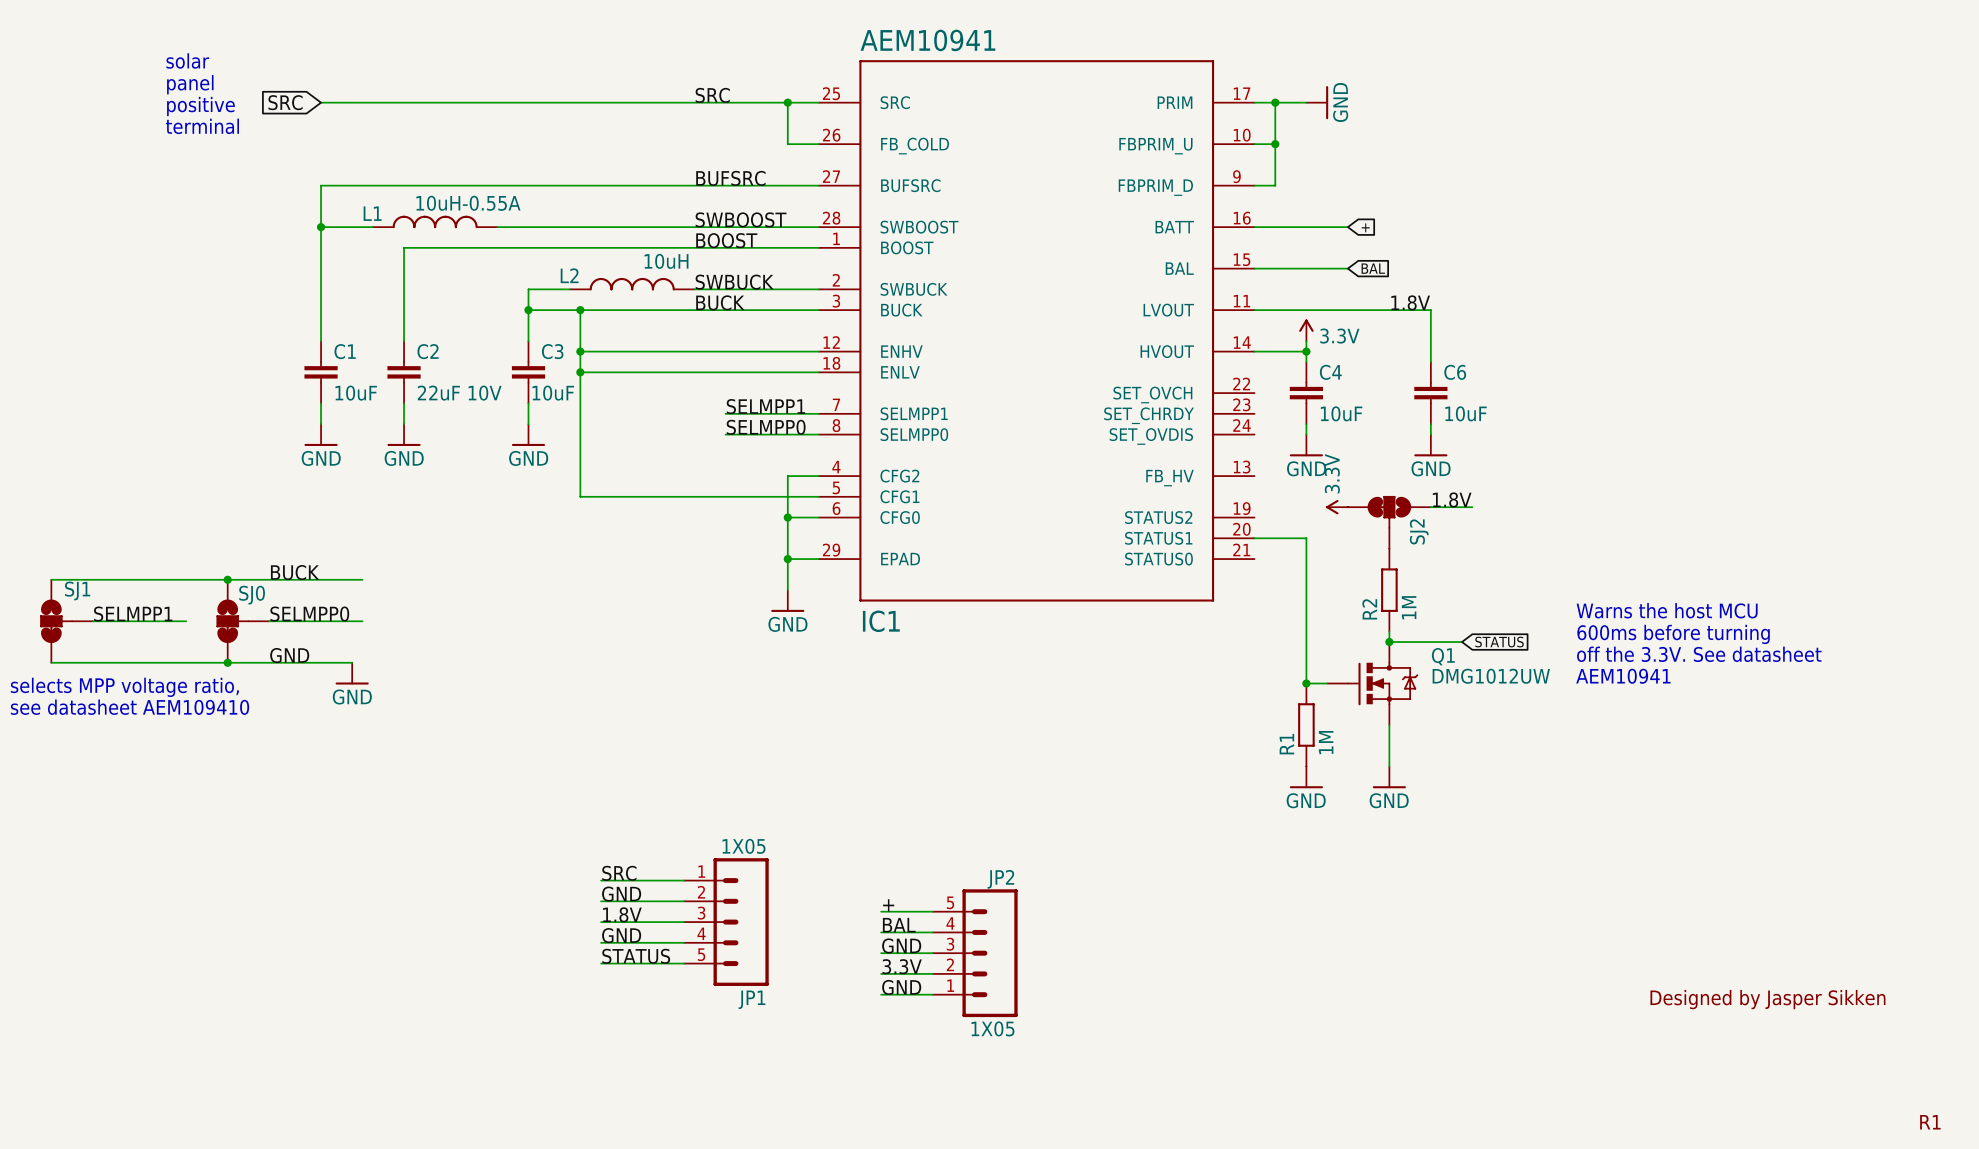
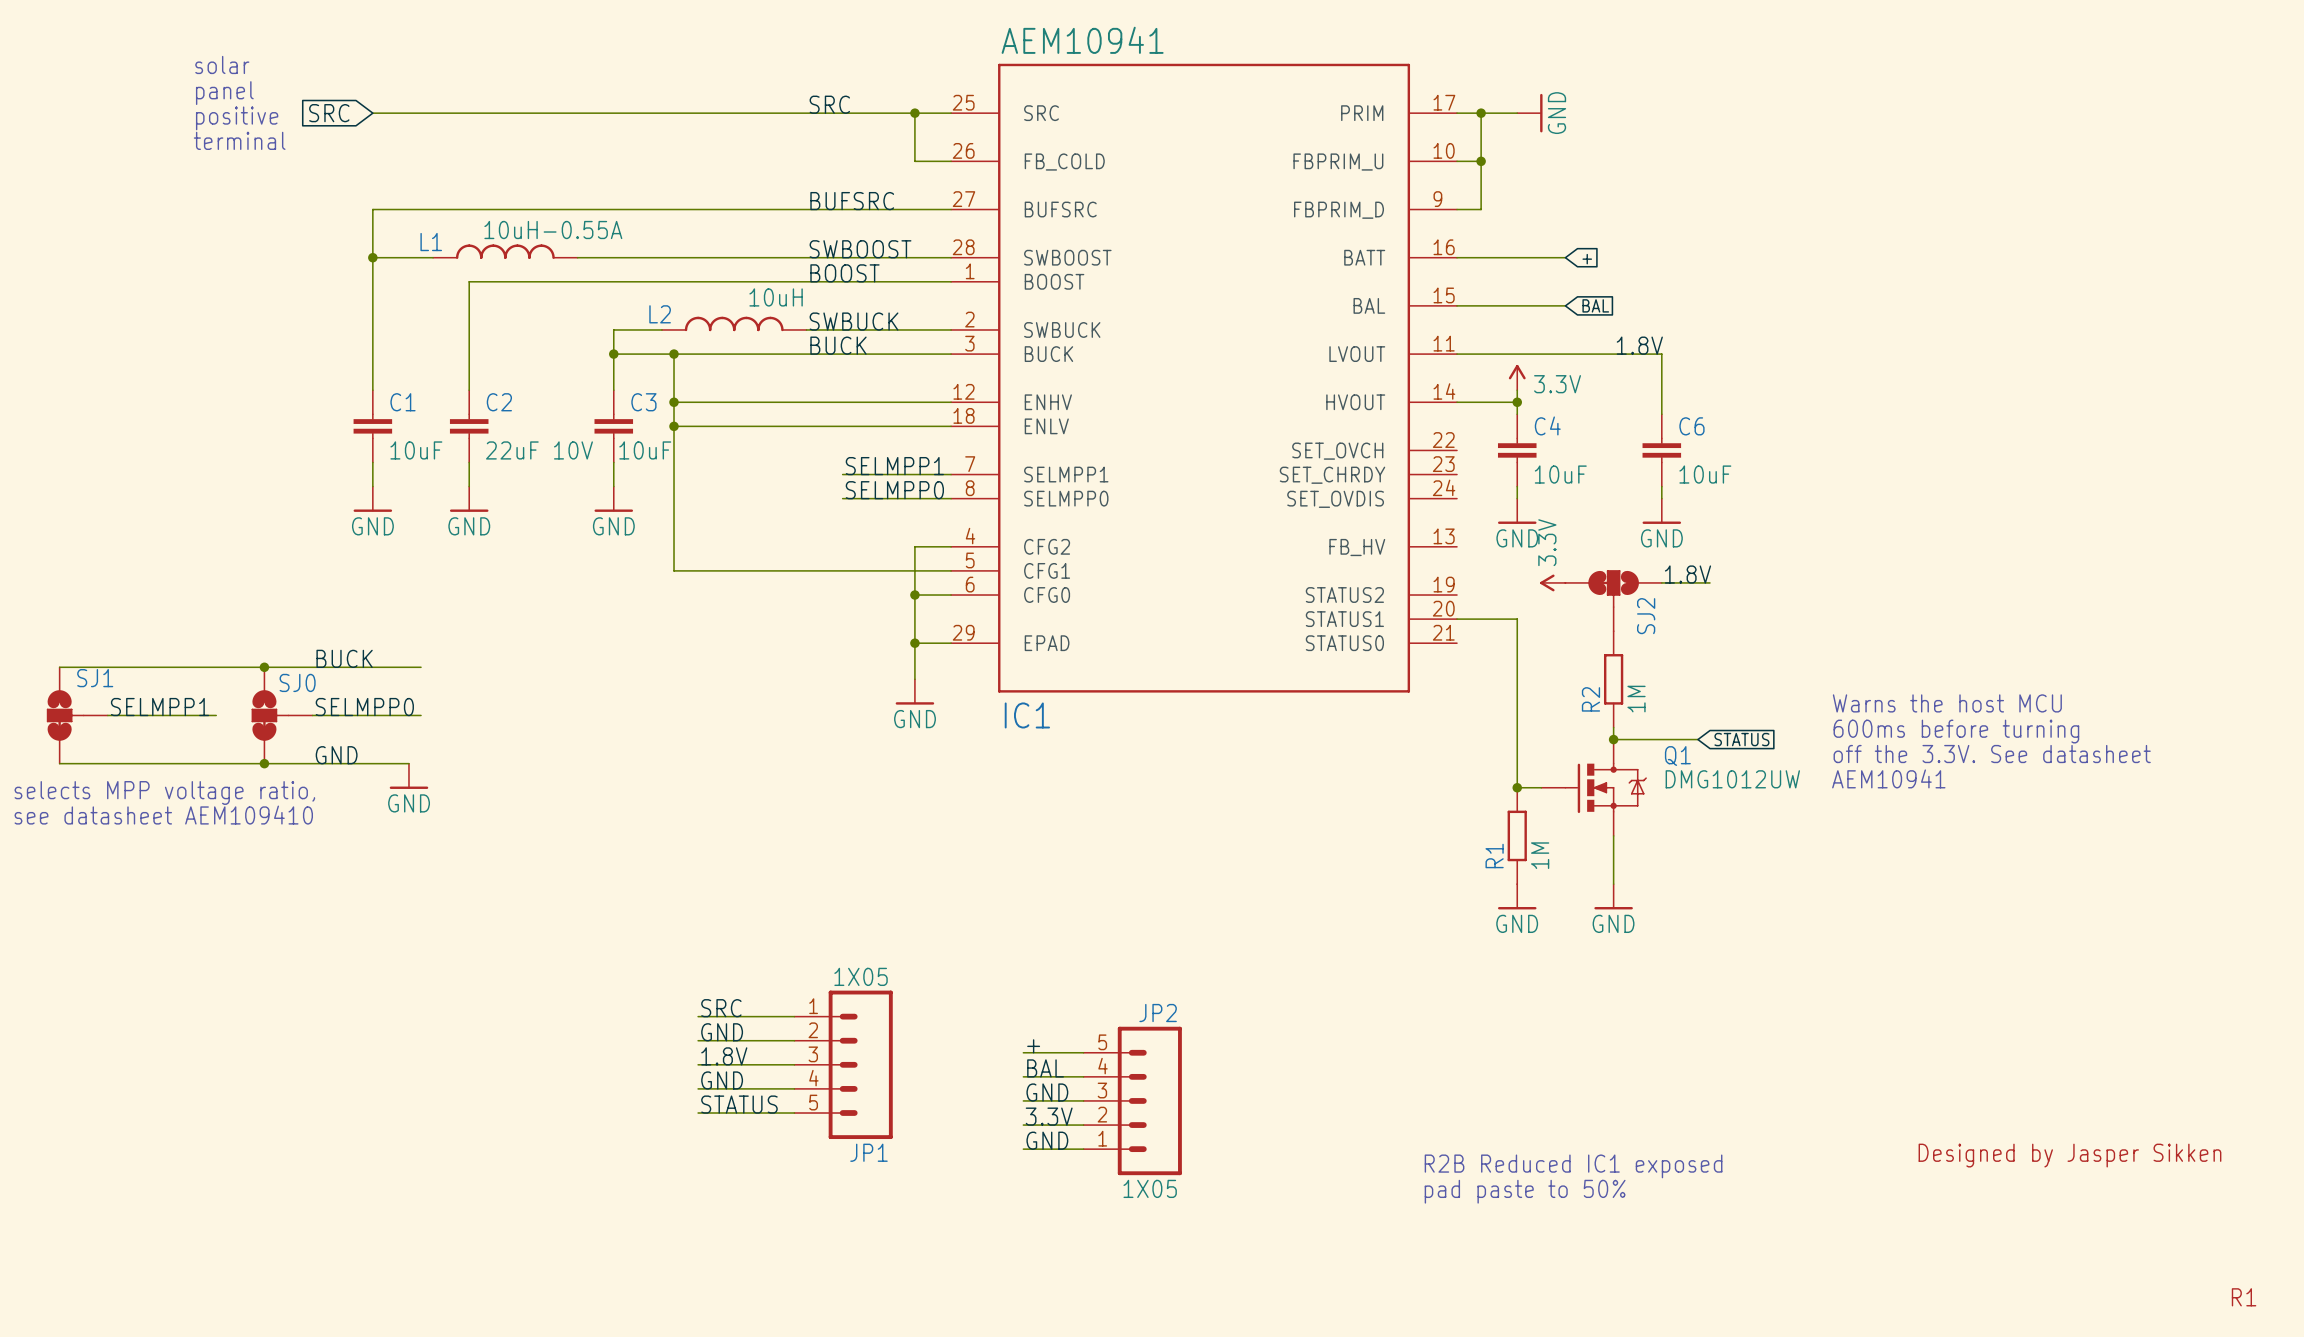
text: none -> R2B Reduced IC1 exposed (1573, 1166)
text: none -> pad paste to 50% (1525, 1191)

